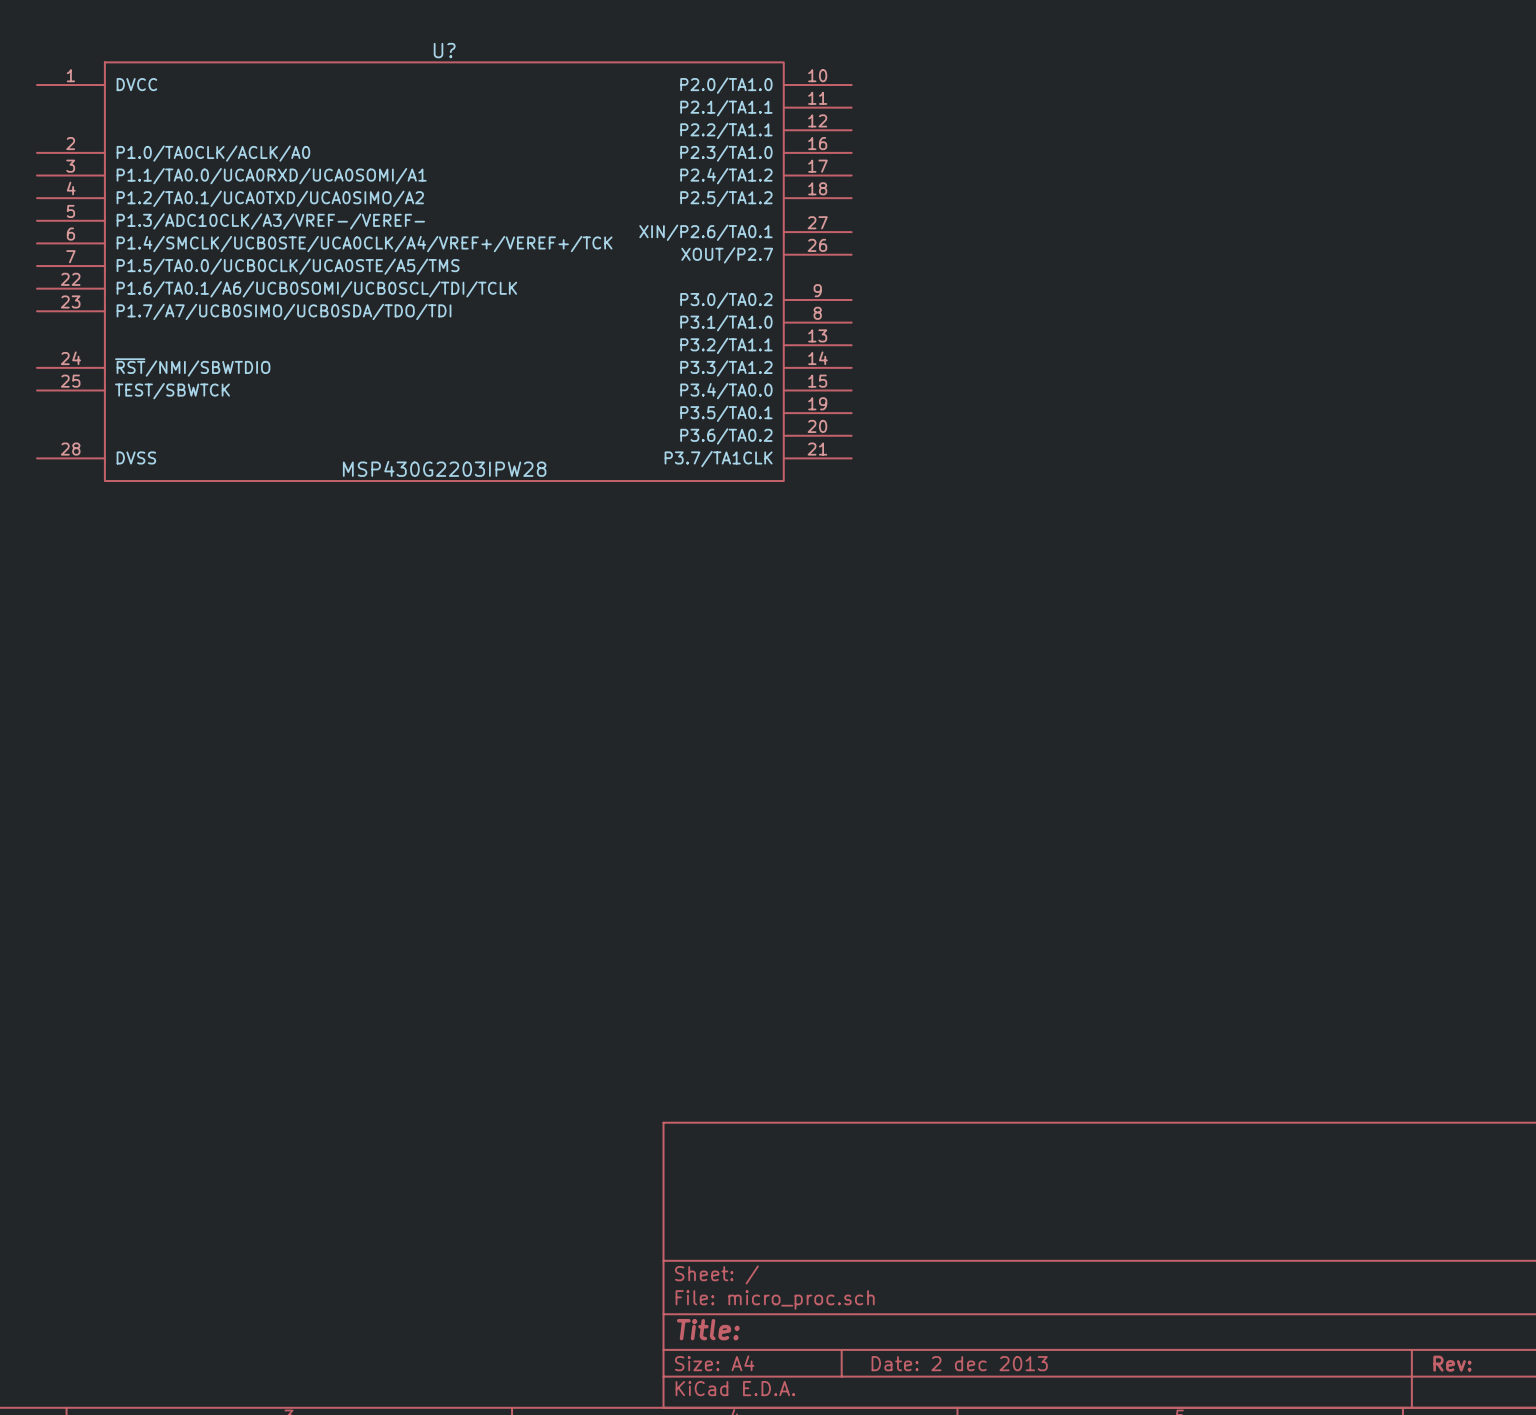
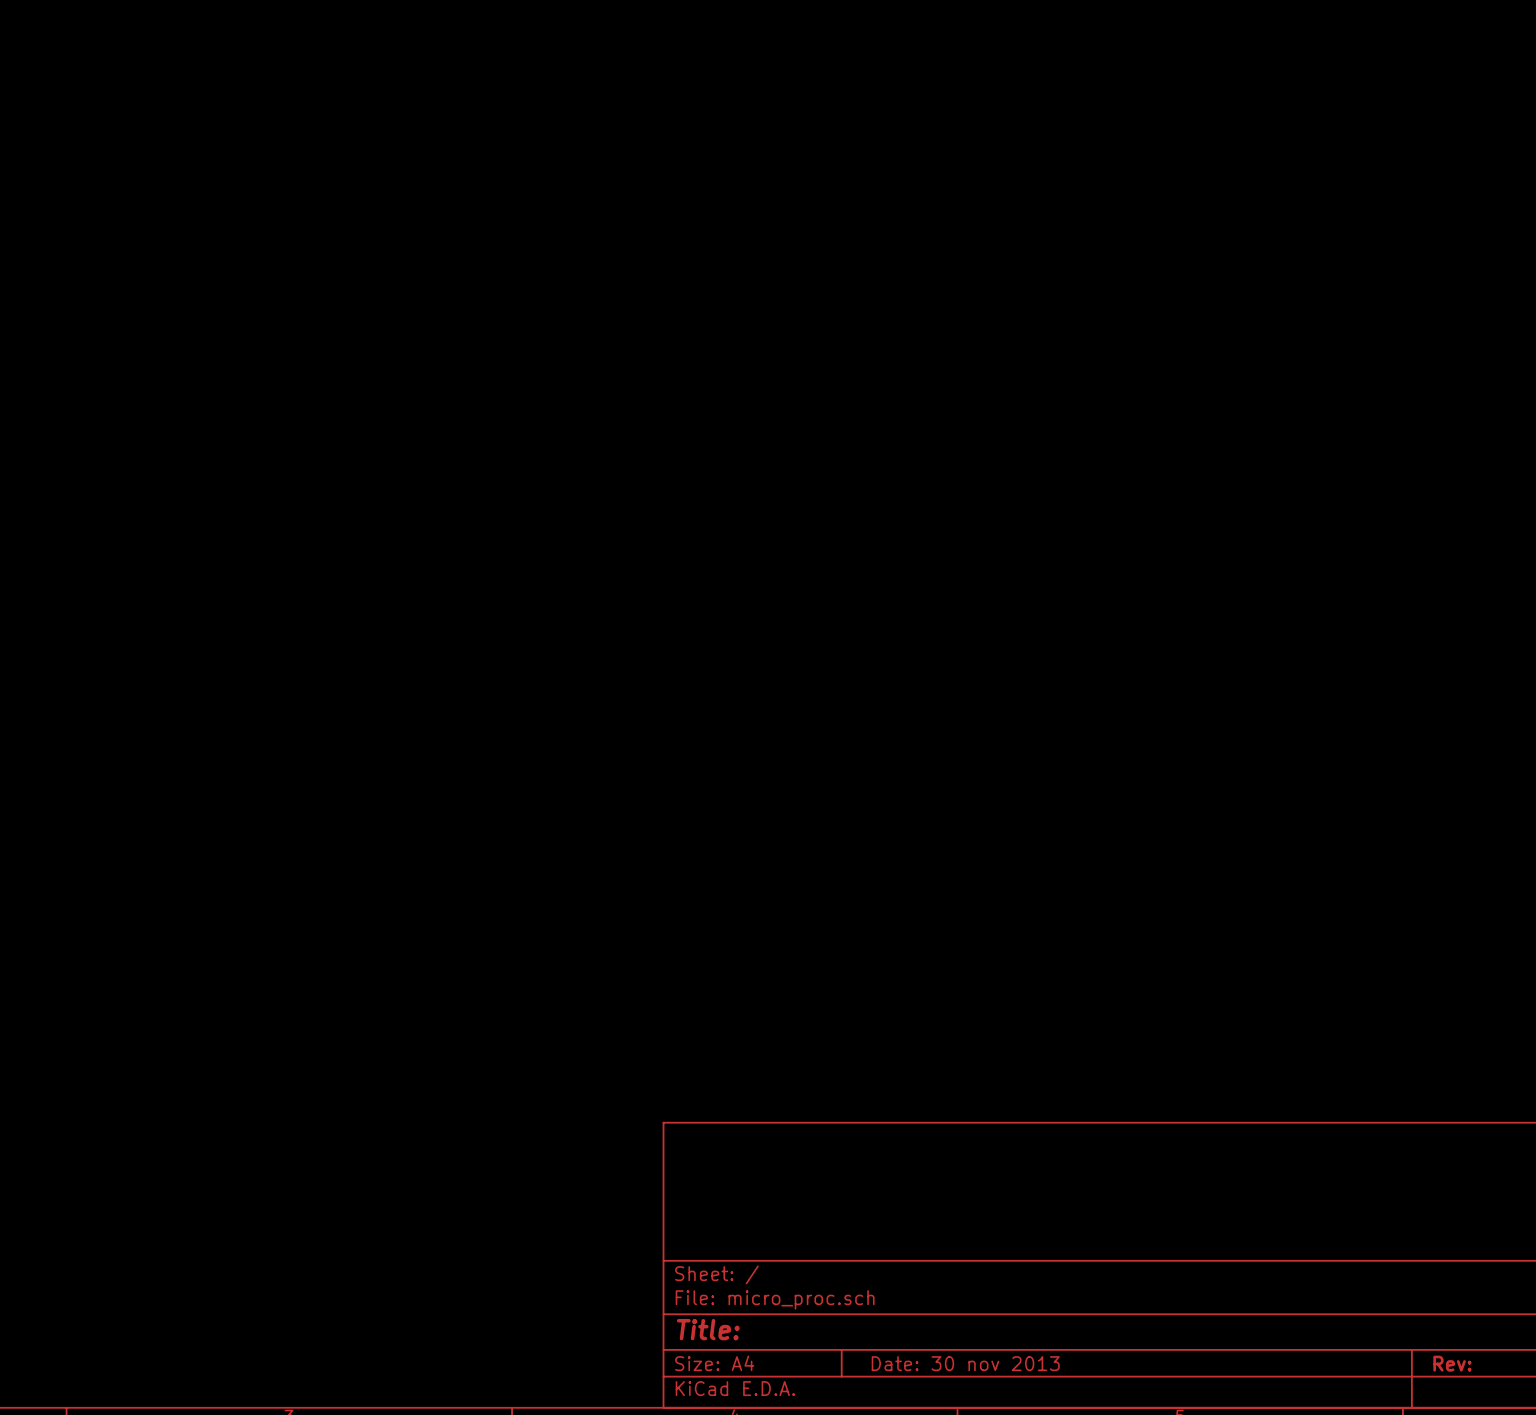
U?: MSP430G2203IPW28 (444, 271) -> none
title block: Date: 2 dec 2013 (959, 1363) -> Date: 30 nov 2013 (965, 1363)

